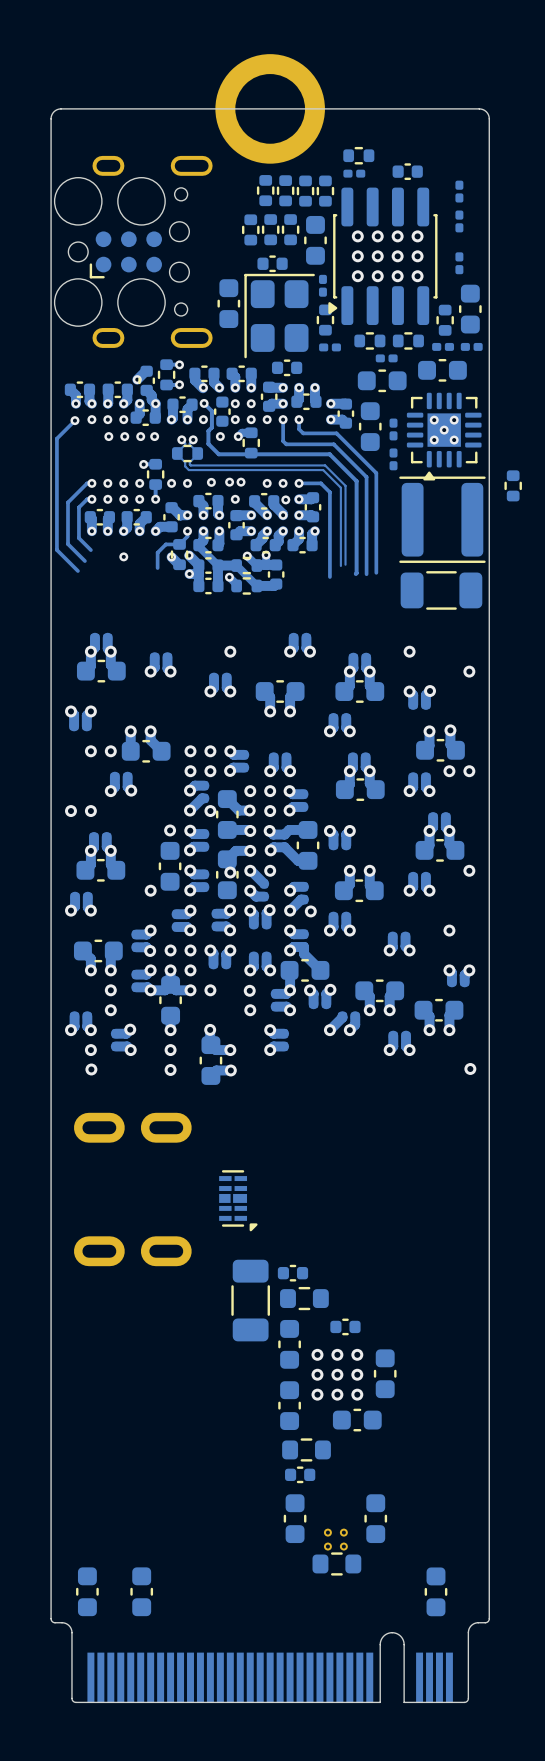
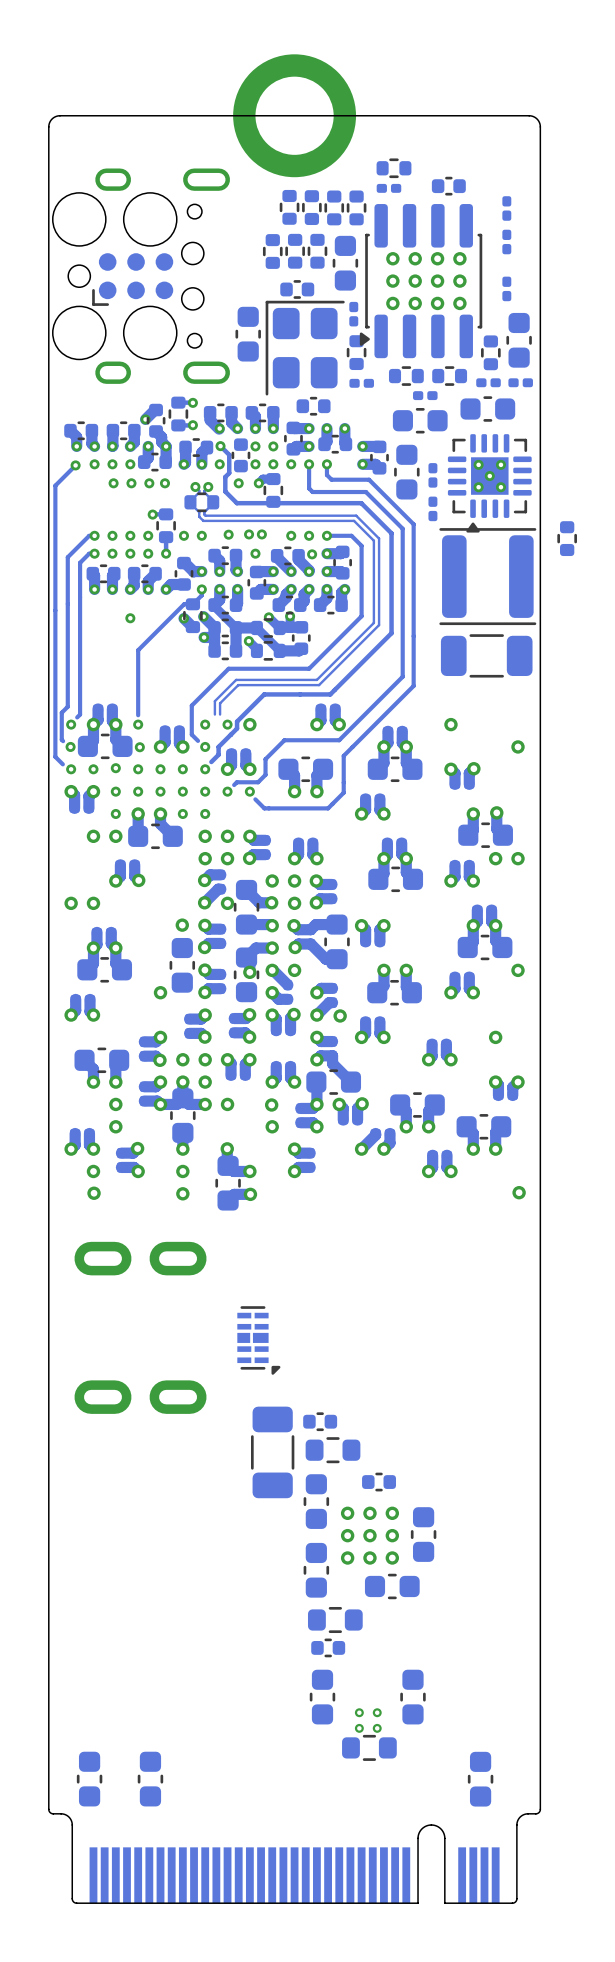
track: (78, 538) (90, 550) -> (80, 597) (80, 714) (77, 717)
track: (67, 544) (84, 561) -> (67, 603) (67, 706) (61, 712) (63, 741)
track: (171, 544) (165, 544) (157, 552) (157, 568) -> (184, 604) (138, 650) (138, 715)
track: (56, 549) (77, 571) -> (55, 610) (55, 756) (62, 764)
track: (329, 555) (329, 576) -> (361, 616) (309, 668) (228, 668) (191, 705) (191, 734) (198, 740)
track: (340, 561) (340, 565) -> (373, 622) (316, 679) (236, 679) (214, 701) (214, 714)
track: (345, 562) (345, 564) -> (379, 625) (319, 685) (238, 685) (220, 703) (220, 714)
track: (356, 570) (355, 574) -> (391, 633) (330, 694) (264, 694) (237, 721) (237, 728) (218, 746) (218, 754) (211, 762)
track: none -> (413, 636) (413, 685) (343, 755) (343, 792) (328, 808) (264, 808) (255, 799)
track: none -> (402, 637) (402, 676) (339, 740) (284, 740) (265, 759) (265, 774) (258, 782) (236, 782) (234, 785)
via: none -> (71, 724)
via: none -> (138, 724)
via: none -> (205, 724)
via: none -> (227, 724)
via: none -> (70, 746)
via: none -> (139, 747)
via: none -> (205, 746)
via: none -> (115, 768)
via: none -> (71, 769)
via: none -> (93, 769)
via: none -> (138, 769)
via: none -> (160, 769)
via: none -> (182, 769)
via: none -> (205, 769)
via: none -> (115, 791)
via: none -> (138, 791)
via: none -> (160, 791)
via: none -> (182, 791)
via: none -> (205, 791)
via: none -> (227, 791)
via: none -> (249, 791)
via: none -> (115, 813)
via: none -> (182, 813)
via: none -> (205, 813)

